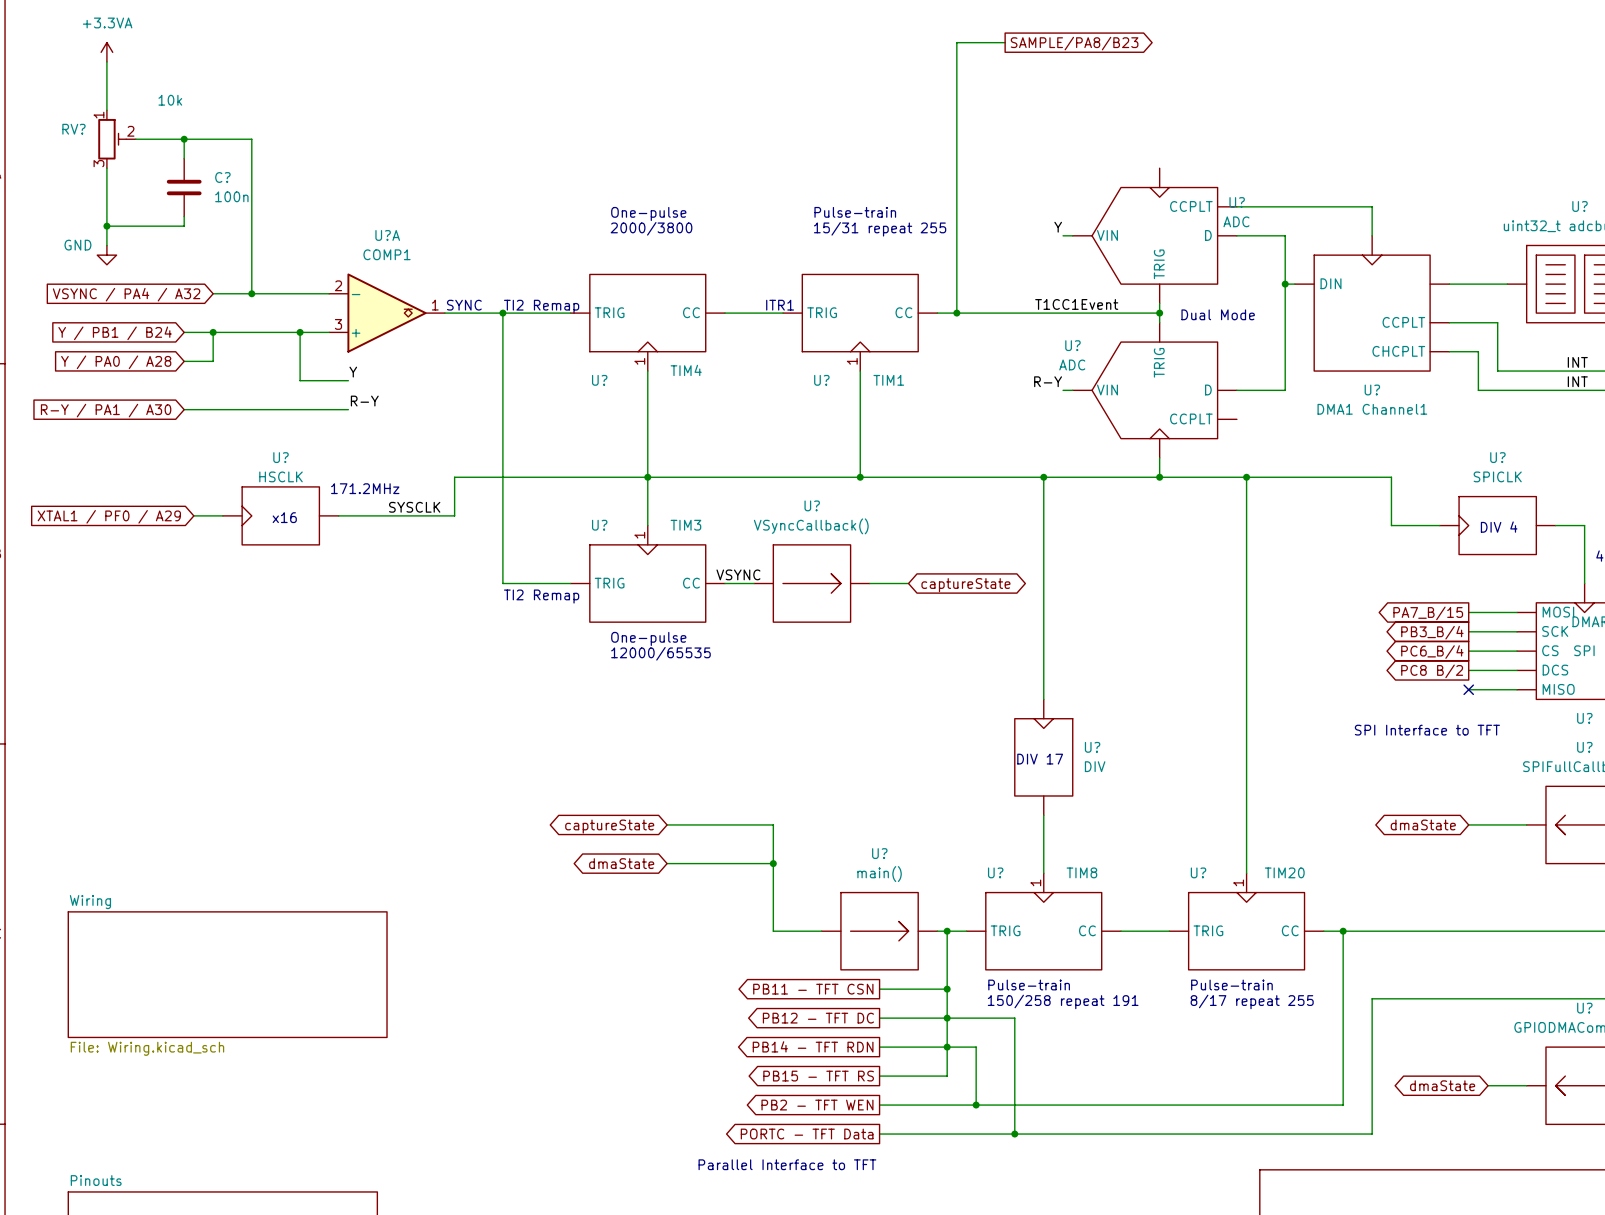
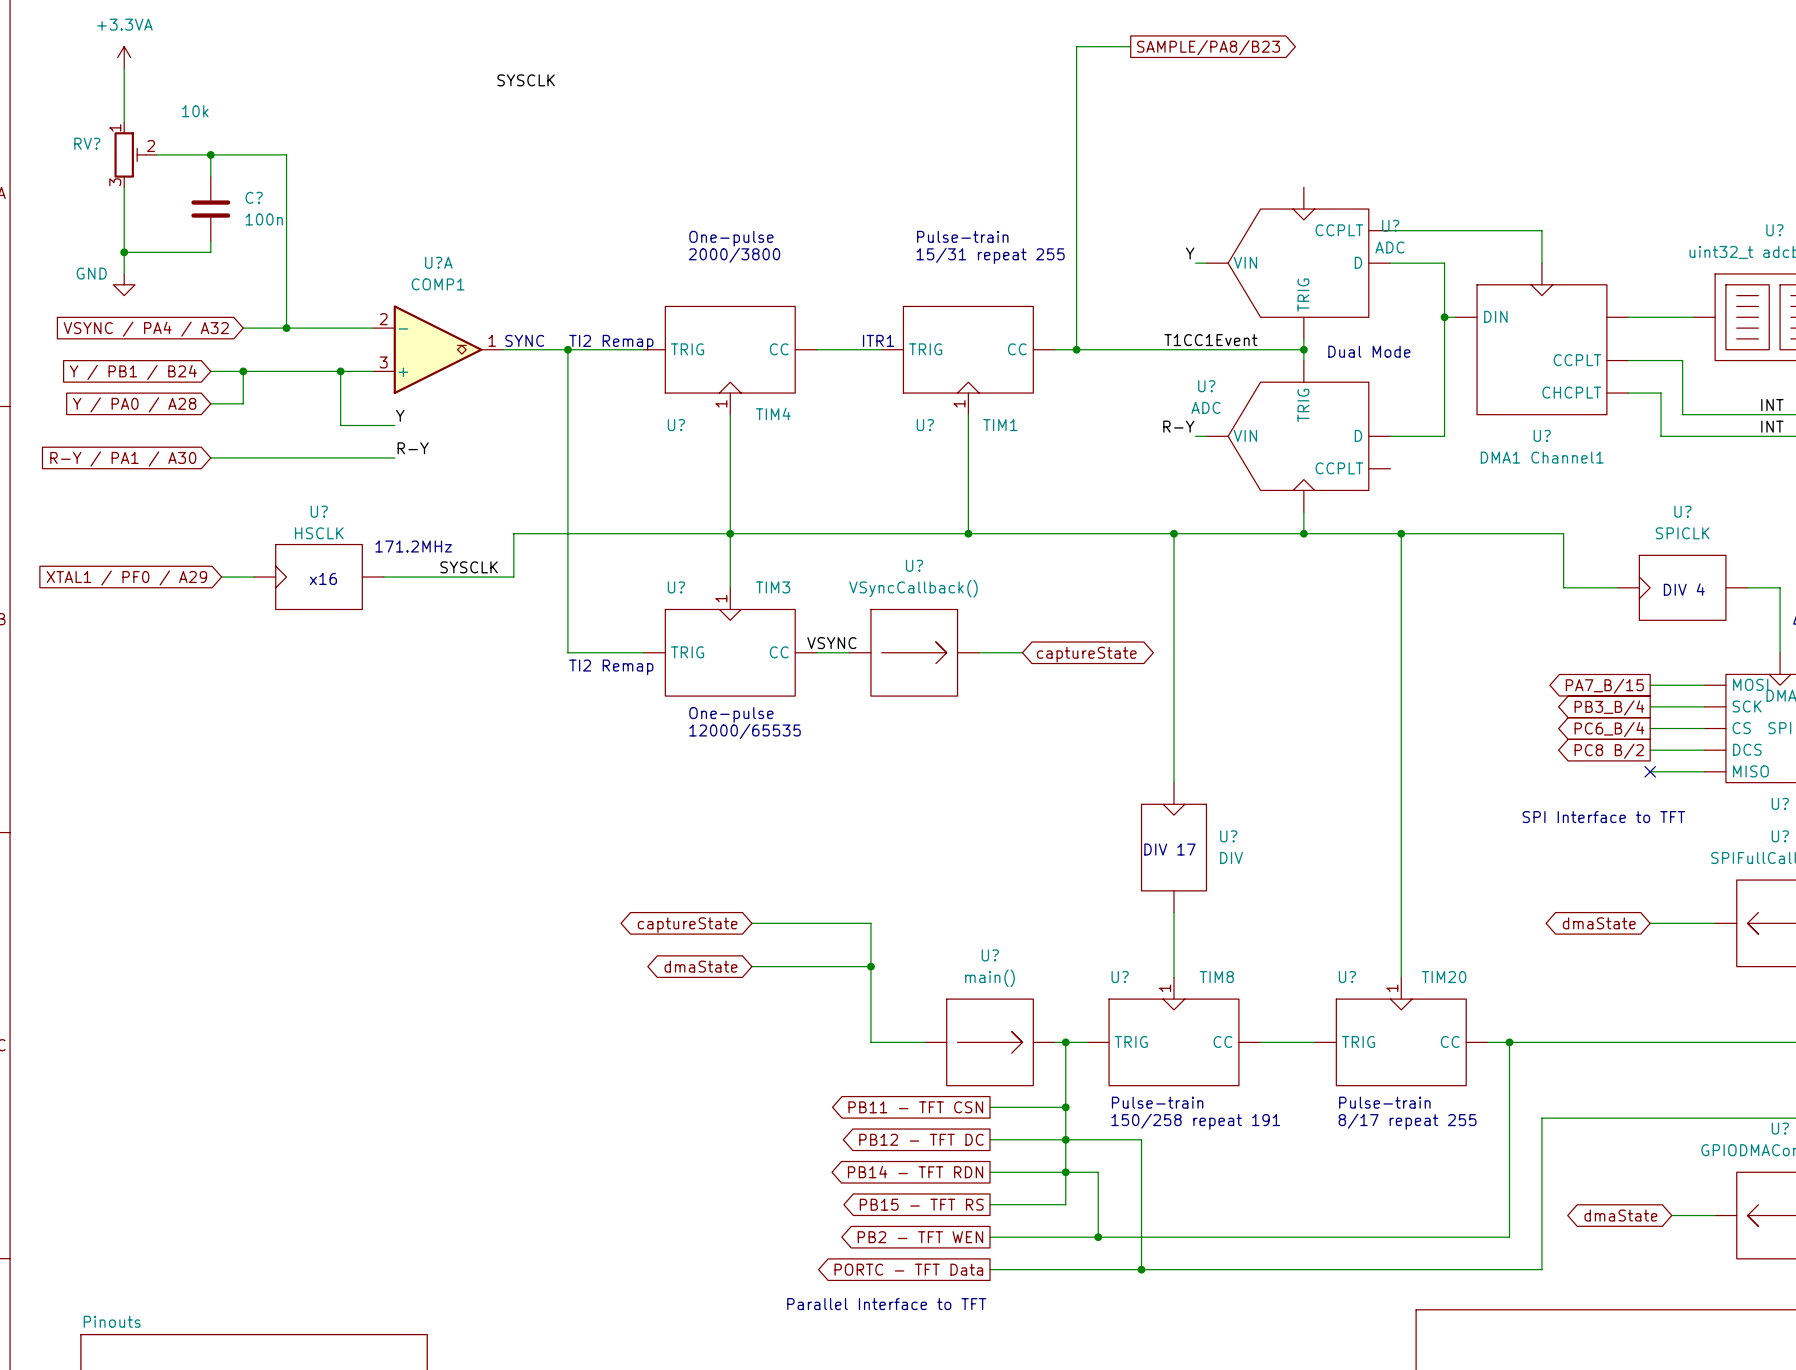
label: none -> SYSCLK (526, 80)
sheet Wiring: File: Wiring.kicad_sch (227, 974) -> none

